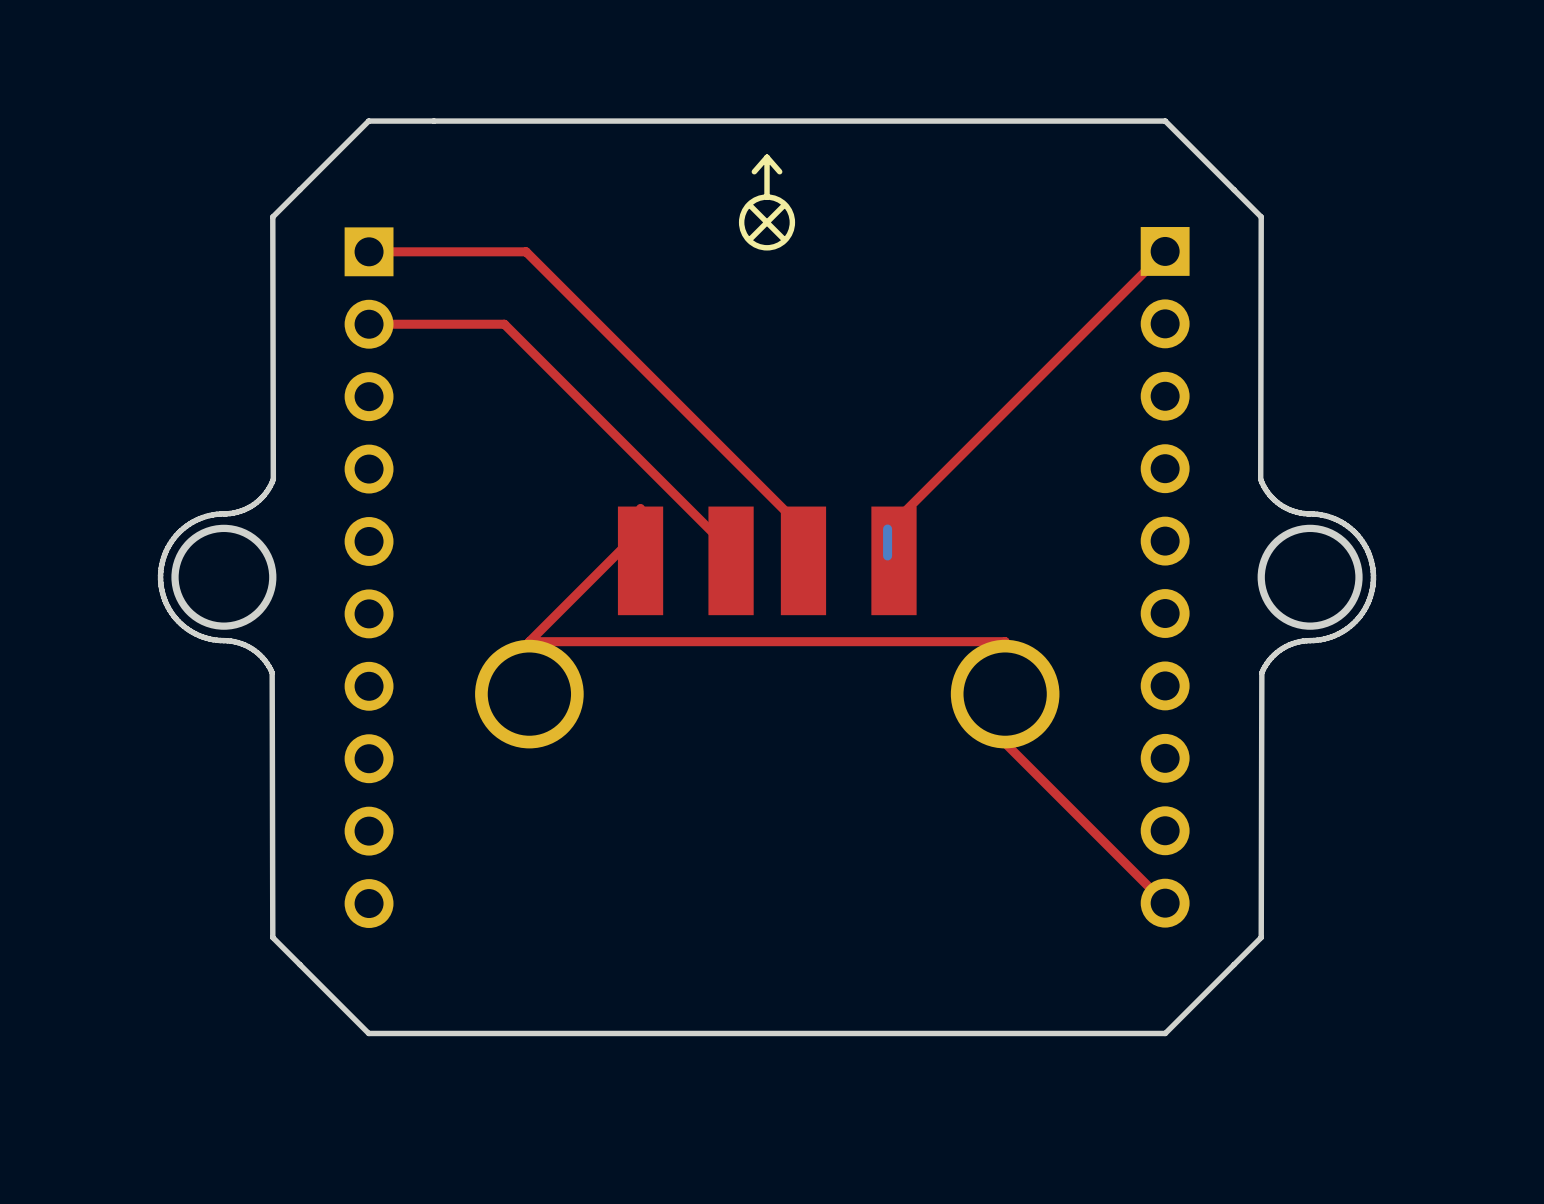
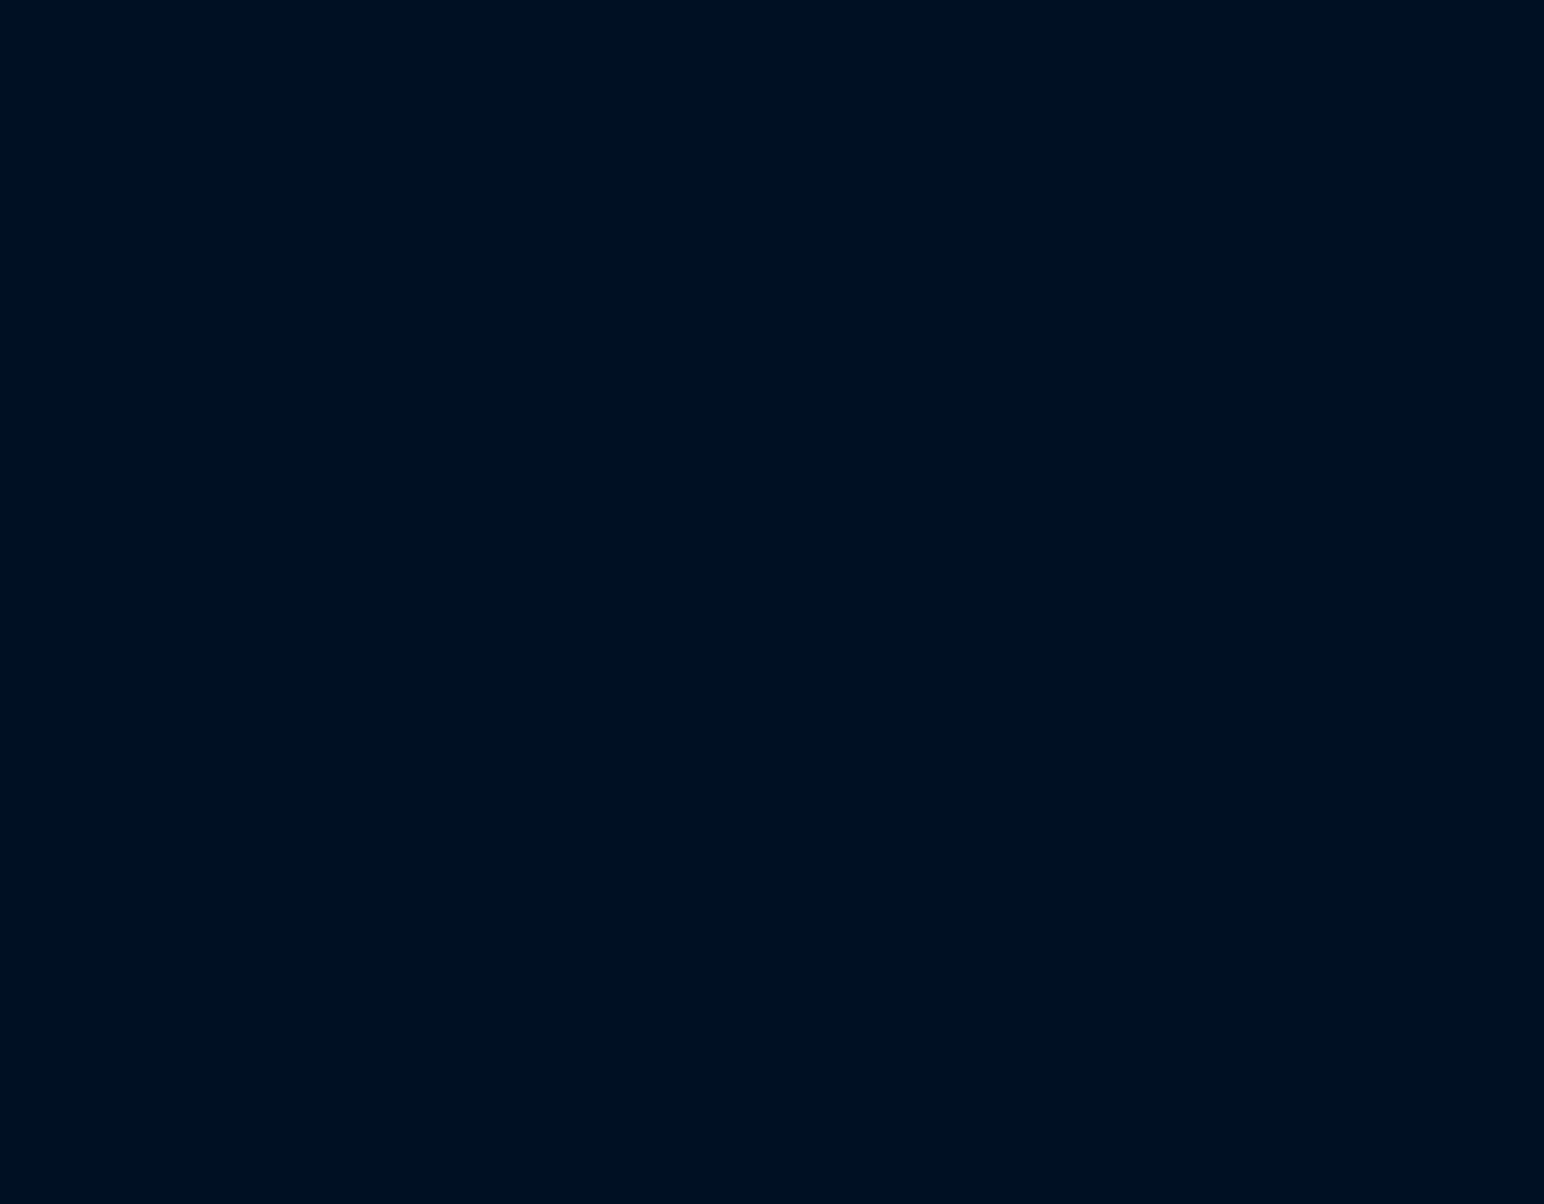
board edge: (1165, 121) (368, 121) (272, 217) (273, 479) (264, 495) (250, 506) (237, 512) (202, 517) (181, 530) (171, 541) (164, 554) (161, 568) (161, 586) (169, 610) (186, 628) (206, 638) (234, 641) (248, 646) (262, 657) (270, 669) (272, 937) (368, 1033) (1165, 1033) (1261, 937) (1261, 672) (1271, 657) (1285, 646) (1299, 641) (1331, 636) (1352, 623) (1362, 613) (1370, 596) (1373, 582) (1372, 568) (1364, 544) (1350, 528) (1327, 516) (1300, 512) (1286, 508) (1272, 497) (1262, 482) (1261, 217) (1165, 121) -> none
drawing: [738, 154, 796, 251] -> none
top track: (369, 251) (526, 251) (803, 529) (803, 560) -> none
top track: (1150, 251) (1165, 251) (893, 522) (893, 560) -> none
top track: (369, 324) (504, 324) (731, 550) (731, 560) -> none
top track: (640, 508) (640, 530) (529, 641) (1005, 641) (1005, 743) (1165, 903) -> none
round board edge: [171, 524, 277, 630] -> none
round board edge: [1257, 524, 1363, 630] -> none
bottom track: (887, 529) (887, 555) -> none
part: (369, 577) -> none
part: (1165, 577) -> none
part: (767, 627) -> none

